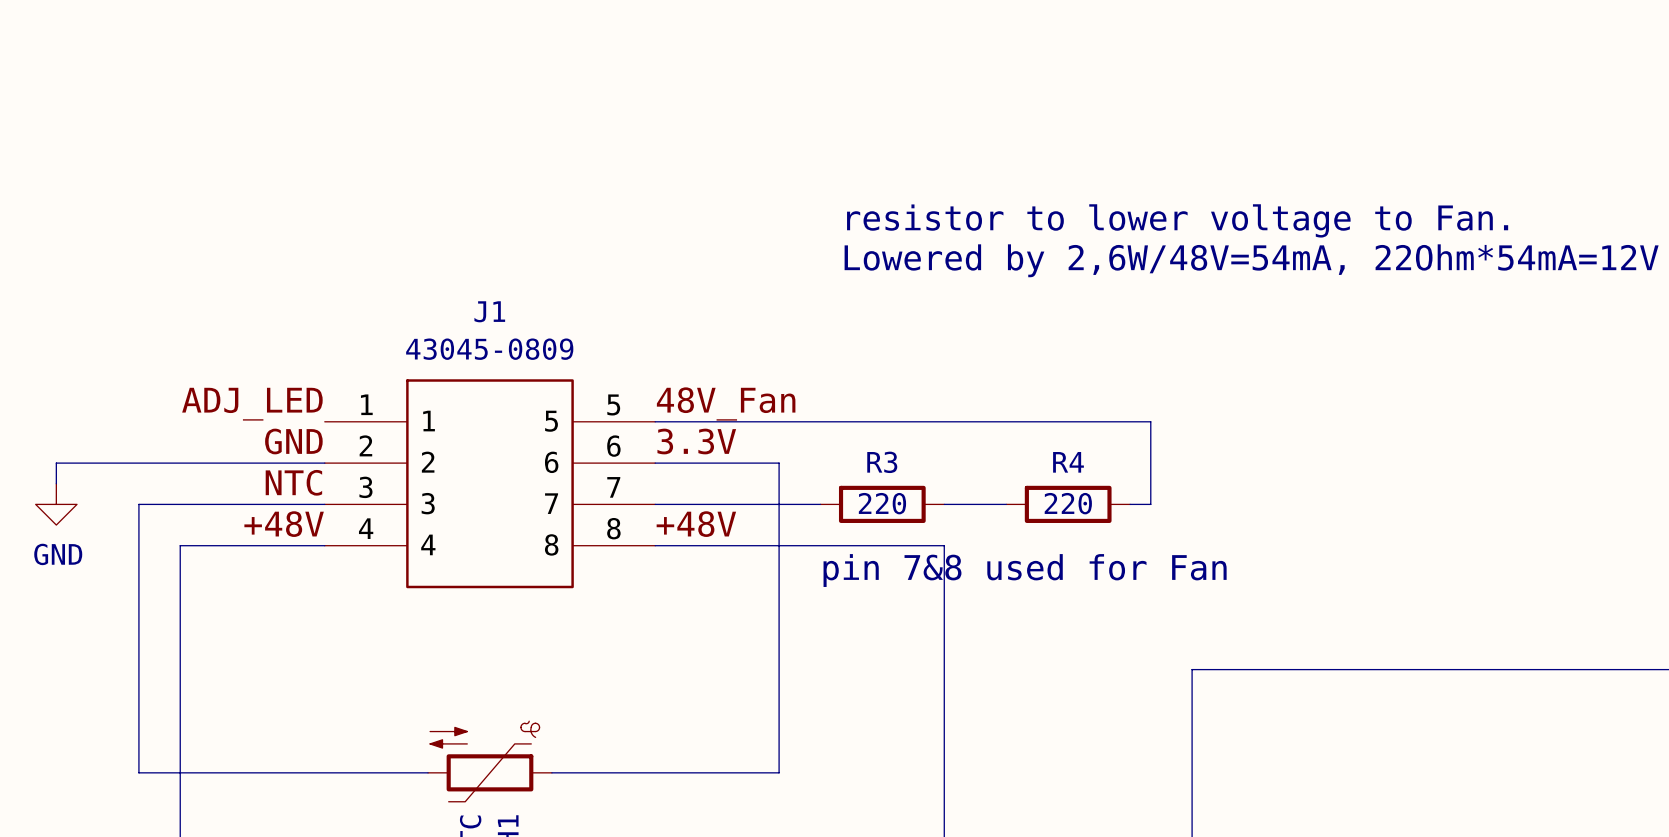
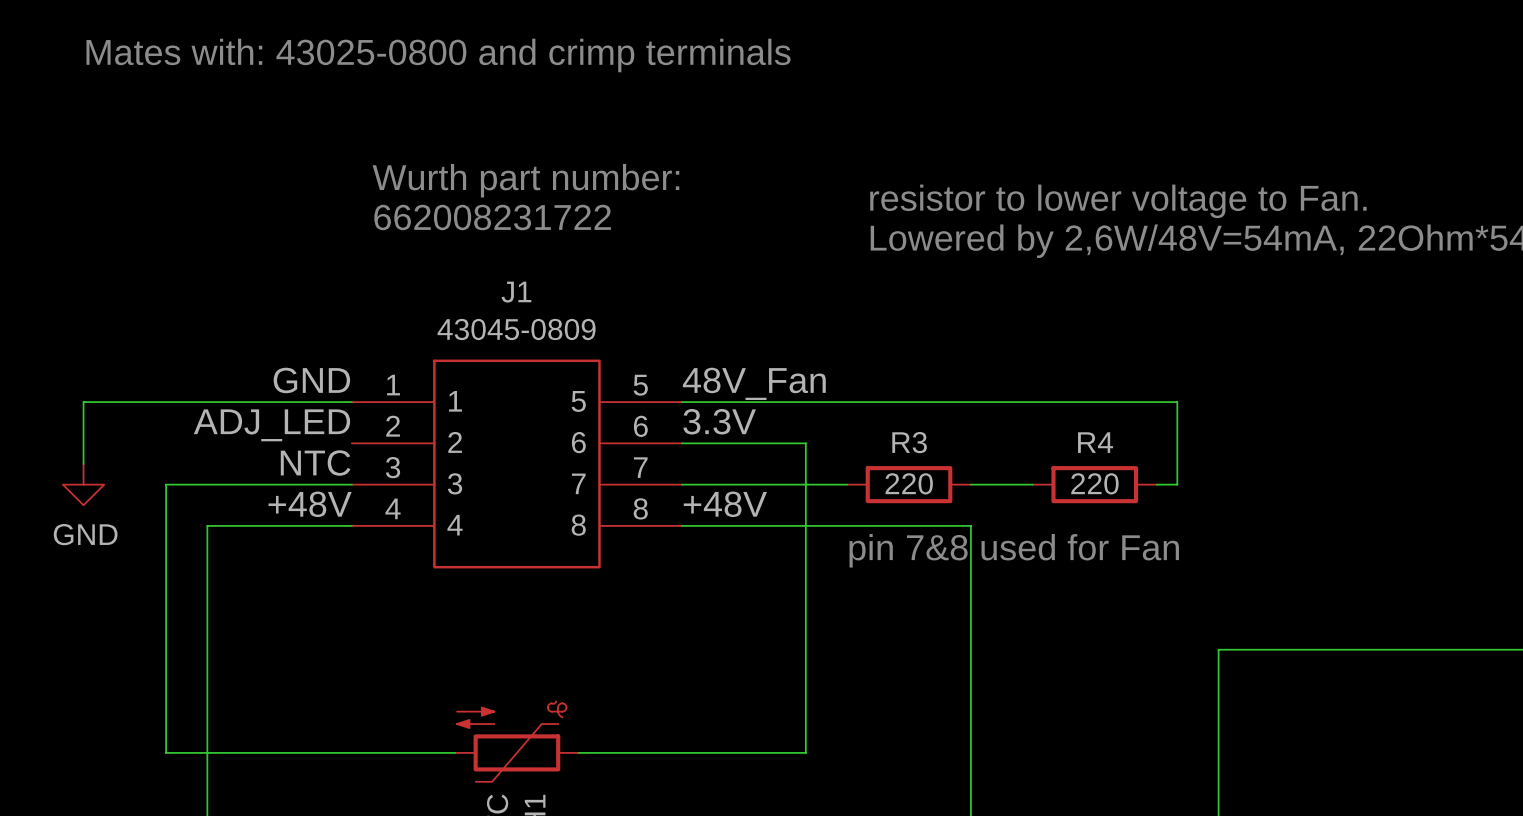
text: none -> Mates with: 43025-0800 and crimp terminals (438, 55)
text: none -> Wurth part number: (525, 180)
text: none -> 662008231722 (492, 217)
label: ADJ_LED (252, 404) -> GND (311, 380)
label: GND (293, 441) -> ADJ_LED (271, 425)
wire: (56, 463) (324, 463) -> (83, 443) (83, 402) (351, 402)

